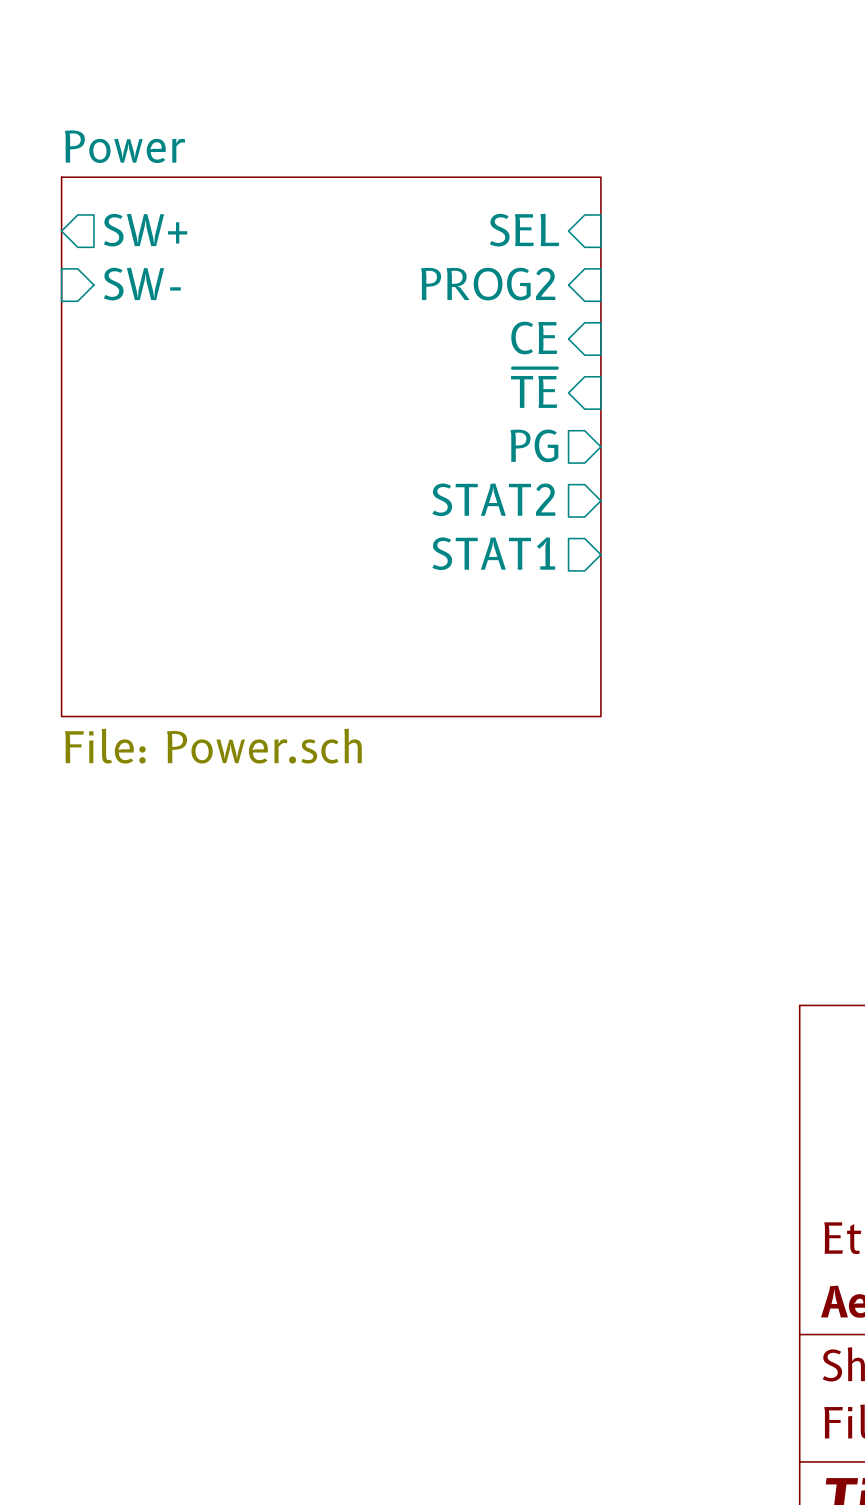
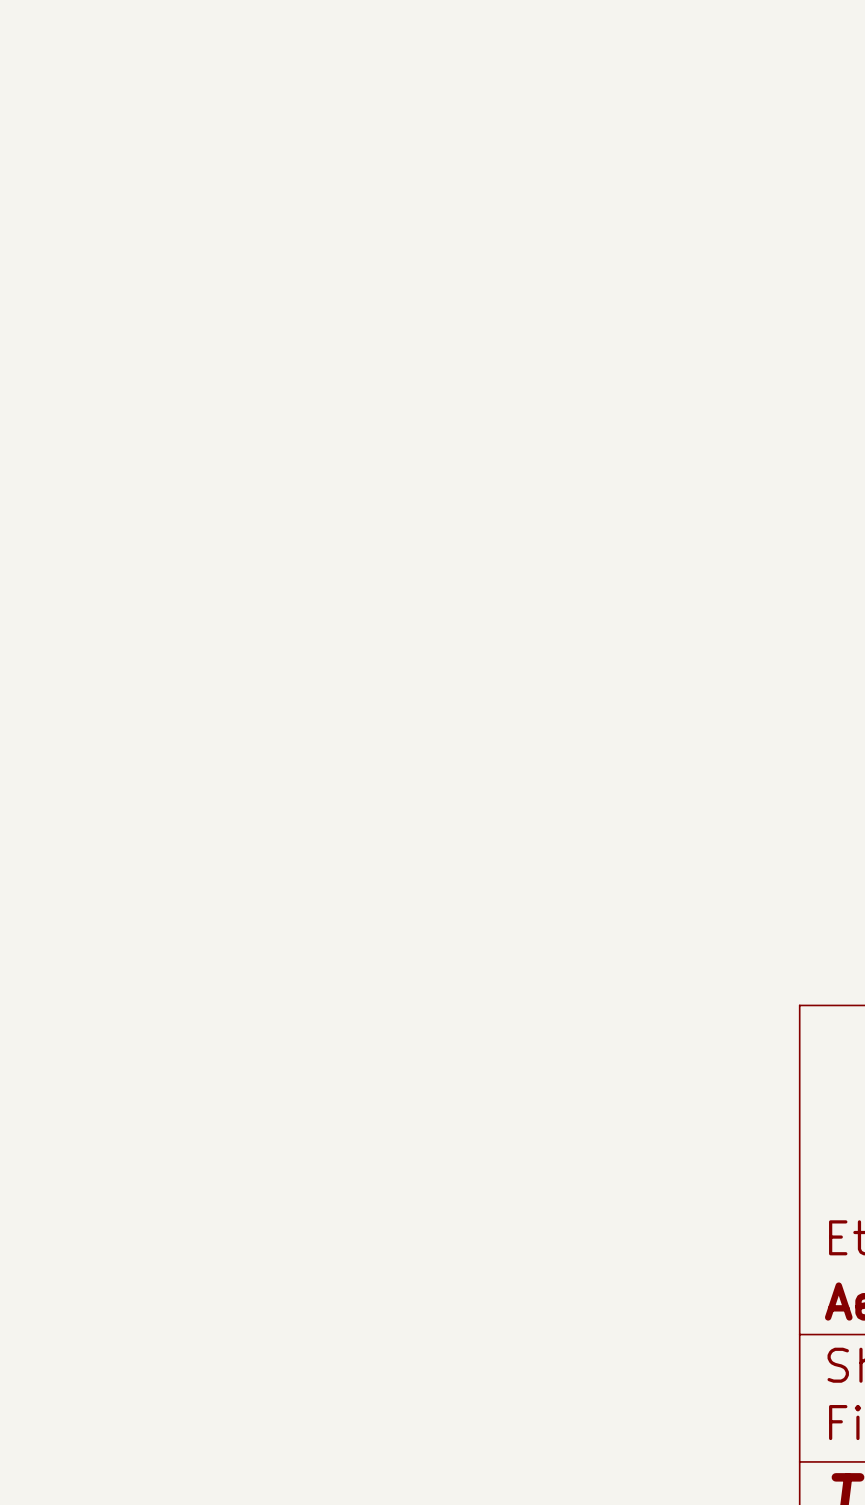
sheet pin: SW+ (145, 230) -> none
sheet pin: SEL (524, 230) -> none
sheet pin: SW- (142, 284) -> none
sheet pin: PROG2 (488, 284) -> none
sheet pin: CE (534, 338) -> none
sheet pin: ~{TE} (534, 388) -> none
sheet pin: PG (534, 445) -> none
sheet Power: File: Power.sch (331, 446) -> none
sheet pin: STAT2 (493, 499) -> none
sheet pin: STAT1 (493, 553) -> none

